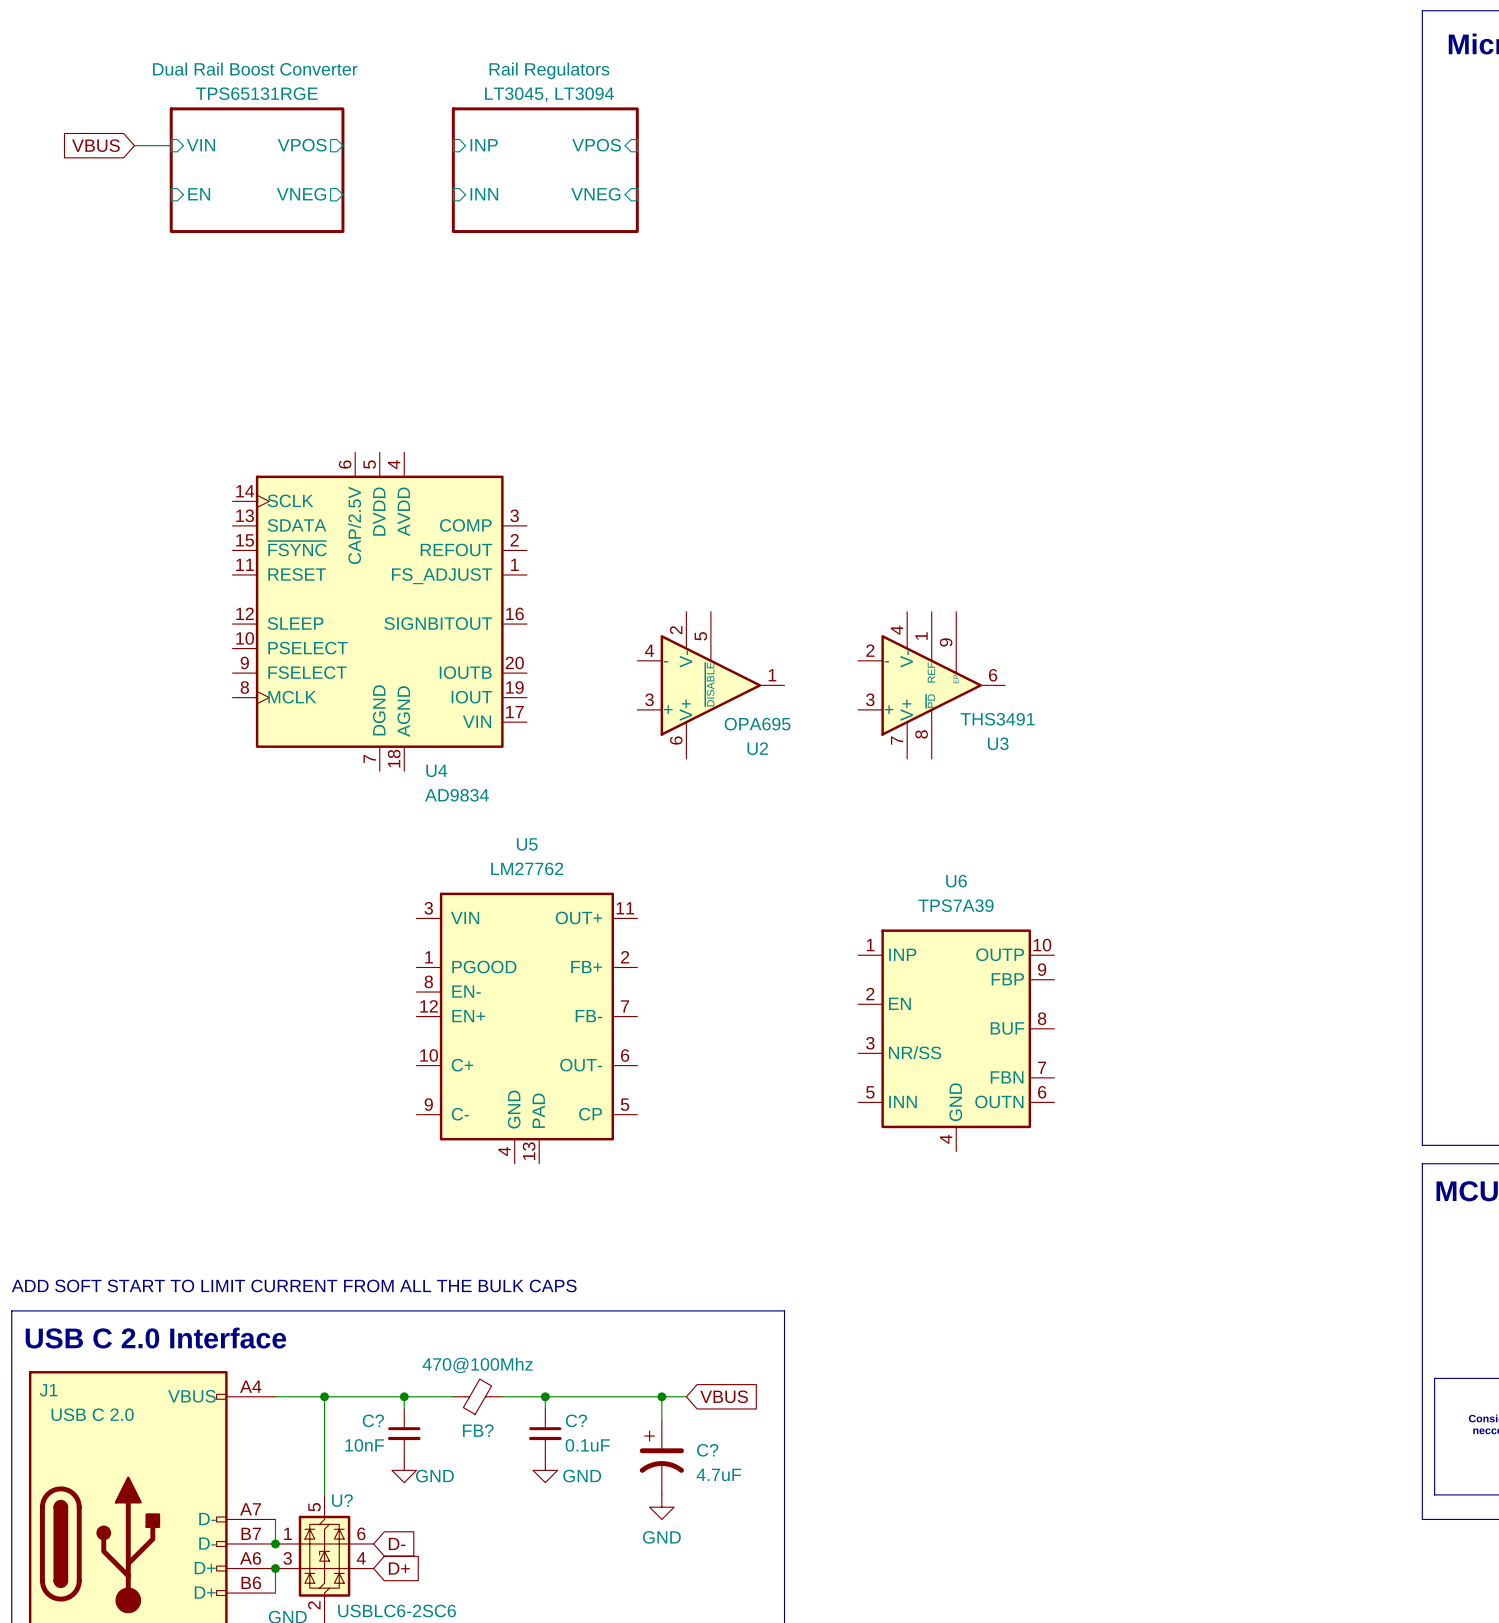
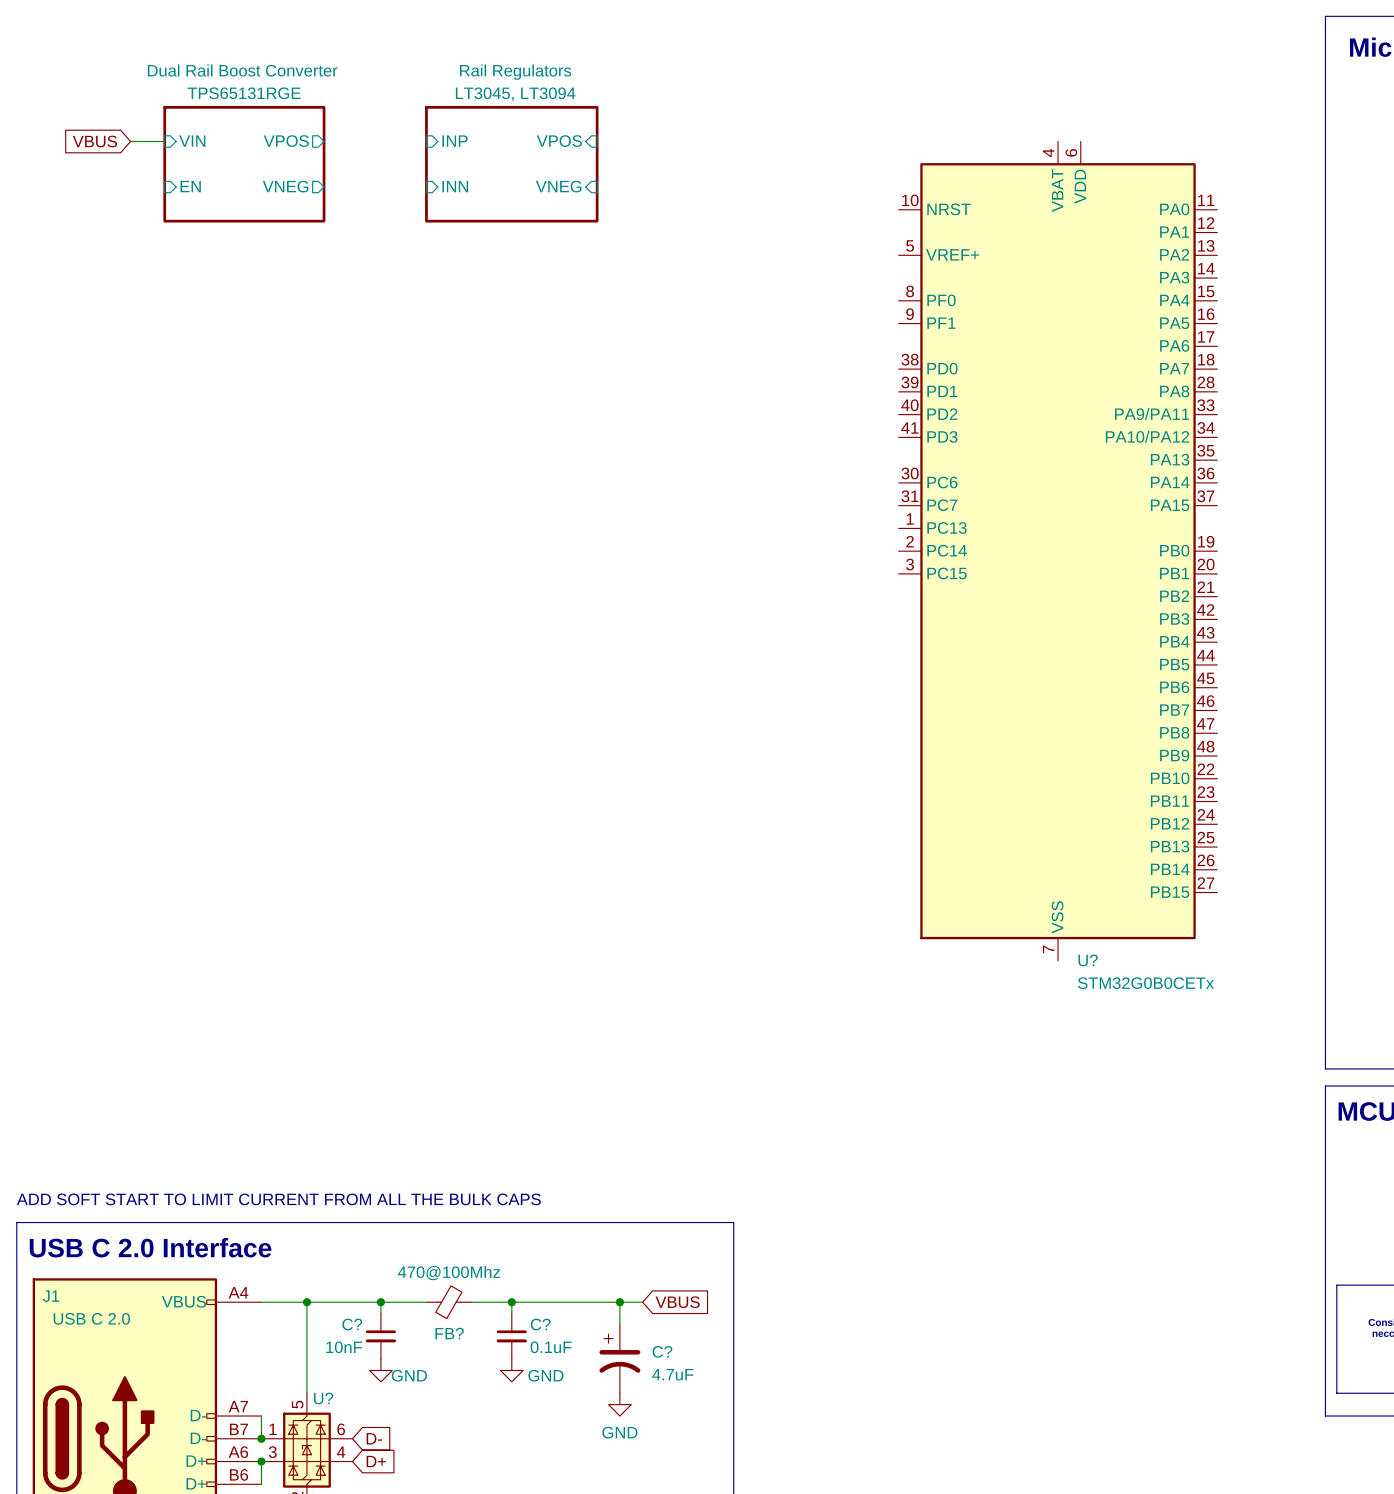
U?: none -> STM32G0B0CETx (1058, 551)
U4: AD9834 (379, 611) -> none
U2: OPA695 (710, 685) -> none
U3: THS3491 (931, 685) -> none
U5: LM27762 (526, 1028) -> none
U6: TPS7A39 (956, 1040) -> none

